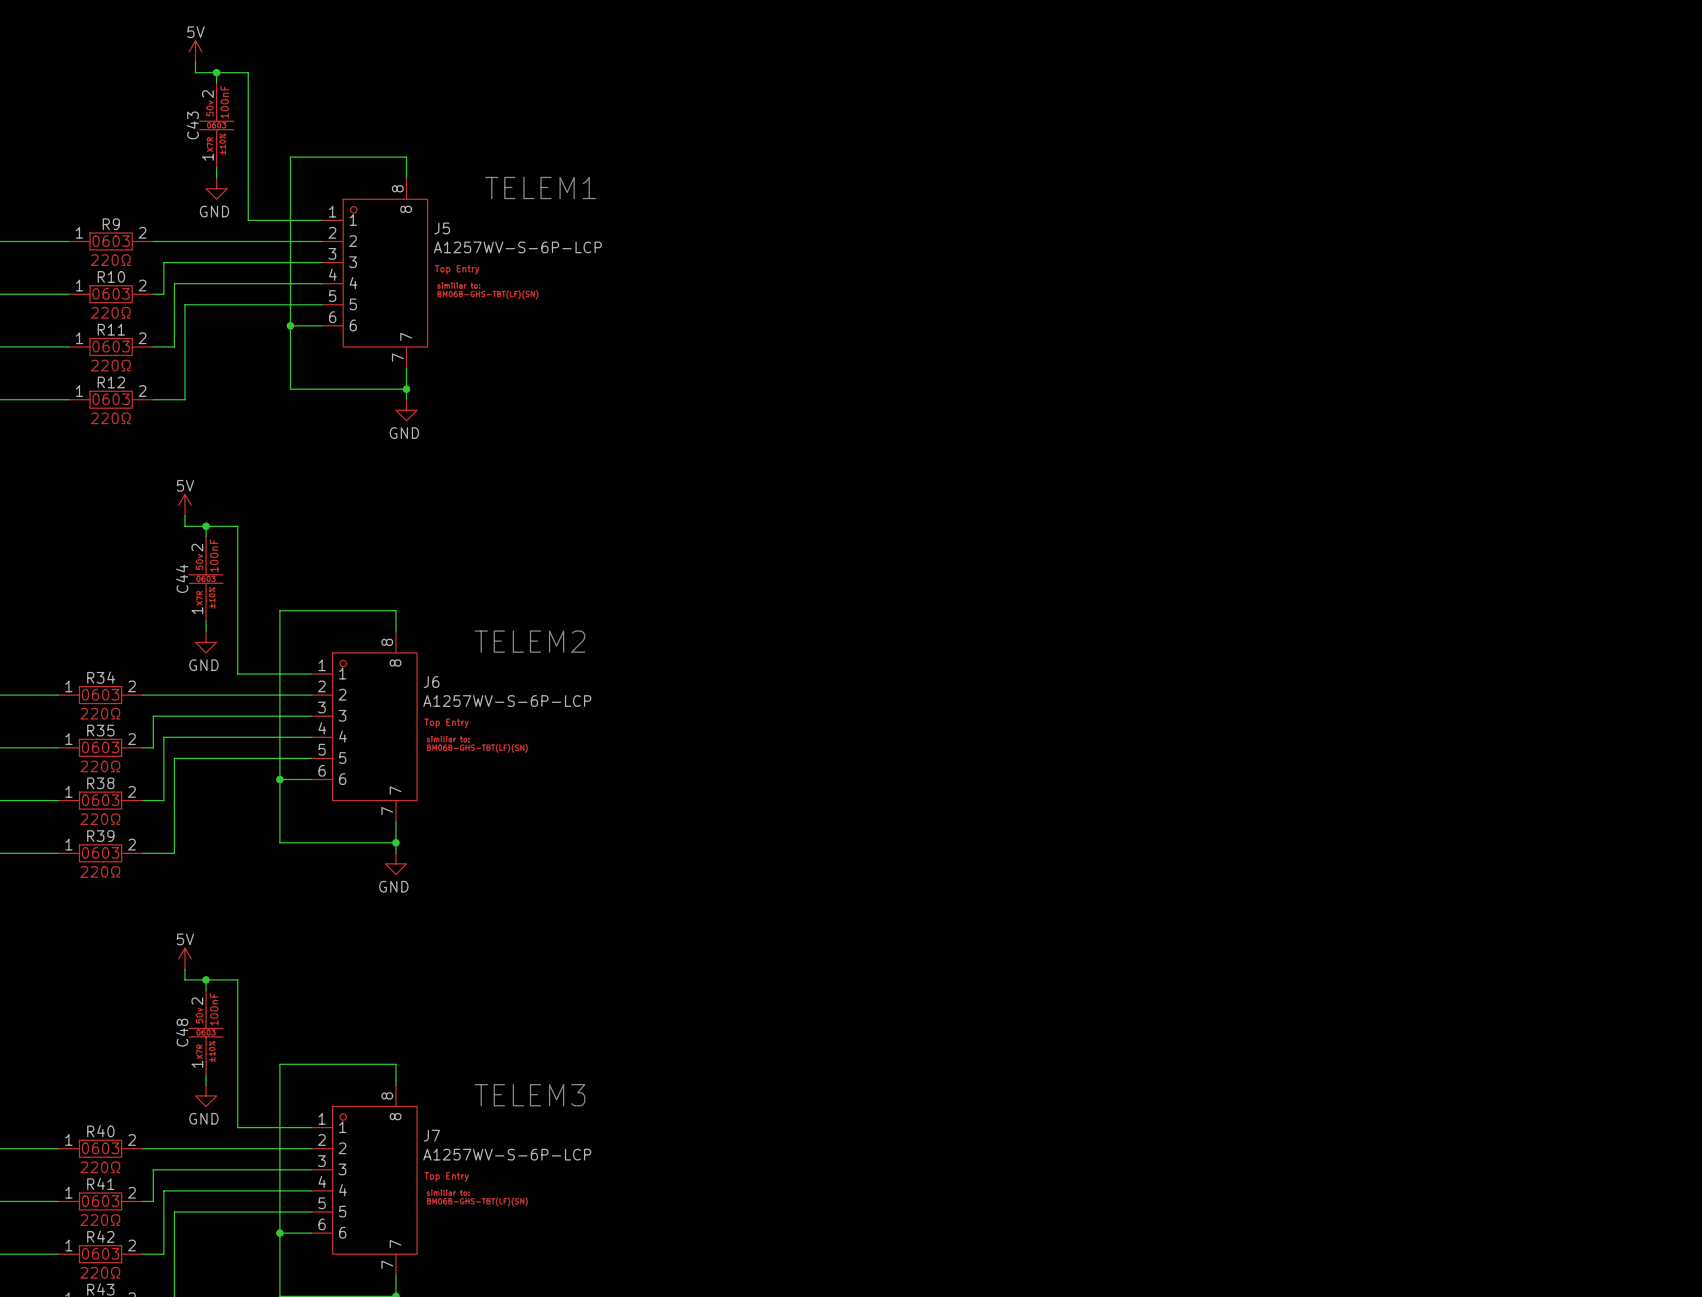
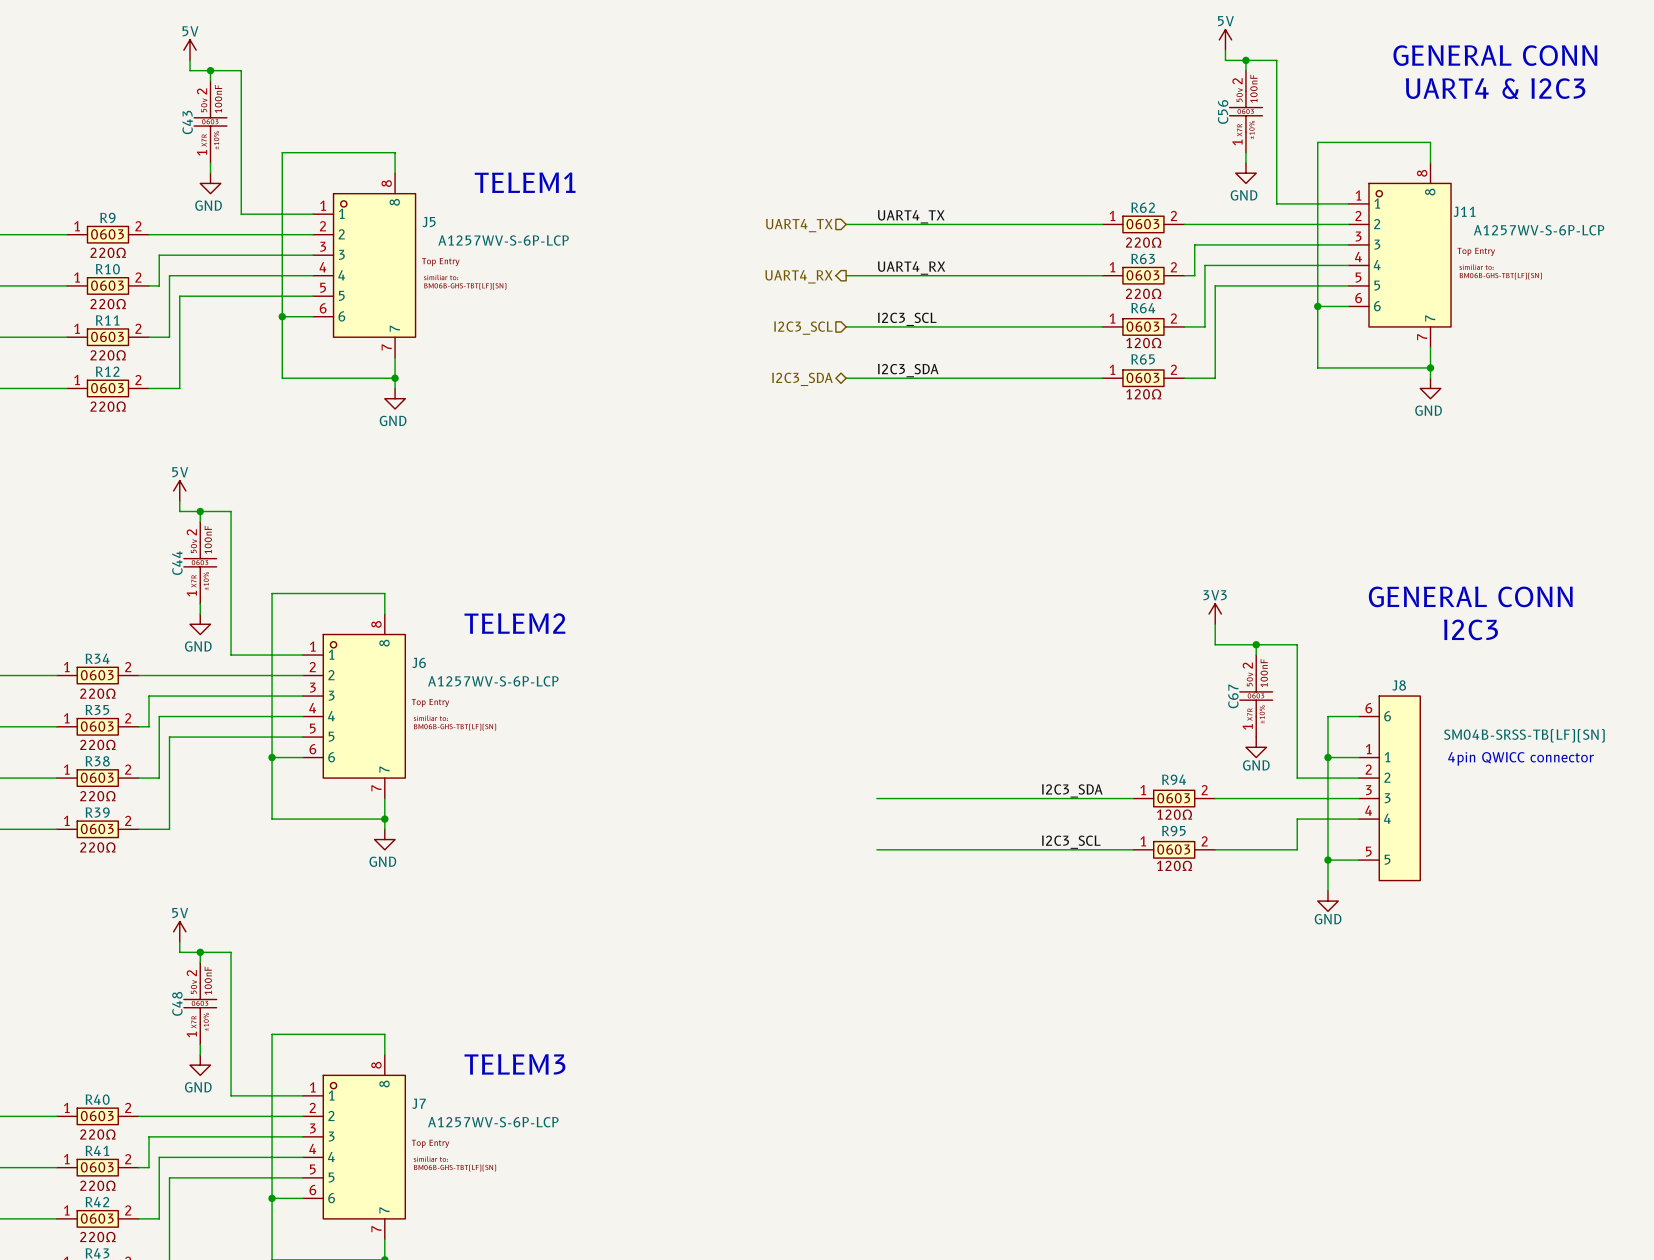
power symbol: none -> 5V (1225, 39)
wire: none -> (1225, 50) (1225, 60) (1276, 60) (1276, 203) (1348, 203)
text: none -> GENERAL CONN (1495, 55)
wire: none -> (1245, 60) (1245, 70)
junction: none -> (1245, 60)
text: none -> UART4 & I2C3 (1495, 88)
C56: none -> (1245, 111)
wire: none -> (1245, 152) (1245, 162)
wire: none -> (1430, 162) (1430, 142) (1317, 142) (1317, 367) (1430, 367)
power symbol: none -> GND (1245, 173)
label: none -> UART4_TX (911, 216)
hierarchical label: none -> UART4_TX (799, 225)
wire: none -> (846, 224) (1102, 224)
R62: none -> (1143, 224)
wire: none -> (1184, 224) (1348, 224)
wire: none -> (1348, 244) (1194, 244) (1194, 275) (1184, 275)
J11: none -> A1257WV-S-6P-LCP (1399, 255)
wire: none -> (1348, 265) (1204, 265) (1204, 326) (1184, 326)
label: none -> UART4_RX (911, 268)
hierarchical label: none -> UART4_RX (799, 276)
wire: none -> (846, 275) (1102, 275)
R63: none -> (1143, 275)
wire: none -> (1348, 285) (1215, 285) (1215, 378) (1184, 378)
wire: none -> (1317, 306) (1348, 306)
junction: none -> (1317, 306)
label: none -> I2C3_SCL (907, 319)
hierarchical label: none -> I2C3_SCL (803, 328)
wire: none -> (846, 326) (1102, 326)
R64: none -> (1143, 326)
wire: none -> (1430, 347) (1430, 378)
junction: none -> (1430, 367)
label: none -> I2C3_SDA (908, 370)
hierarchical label: none -> I2C3_SDA (802, 379)
wire: none -> (846, 378) (1102, 378)
R65: none -> (1143, 378)
power symbol: none -> GND (1430, 388)
text: none -> GENERAL CONN (1470, 596)
power symbol: none -> 3V3 (1215, 614)
wire: none -> (1215, 624) (1215, 644) (1297, 644) (1297, 778) (1358, 778)
text: none -> I2C3 (1470, 629)
wire: none -> (1256, 644) (1256, 655)
junction: none -> (1256, 644)
C67: none -> (1256, 696)
wire: none -> (1358, 716) (1327, 716) (1327, 890)
power symbol: none -> GND (1256, 747)
wire: none -> (1327, 757) (1358, 757)
junction: none -> (1327, 757)
text: none -> 4pin QWICC connector (1521, 758)
J8: none -> SM04B-SRSS-TB(LF)(SN) (1389, 788)
label: none -> I2C3_SDA (1072, 790)
wire: none -> (876, 798) (1133, 798)
R94: none -> (1174, 798)
wire: none -> (1215, 798) (1358, 798)
wire: none -> (1358, 819) (1297, 819) (1297, 849) (1215, 849)
label: none -> I2C3_SCL (1071, 842)
wire: none -> (876, 849) (1133, 849)
R95: none -> (1174, 849)
wire: none -> (1327, 860) (1358, 860)
junction: none -> (1327, 860)
power symbol: none -> GND (1327, 901)

